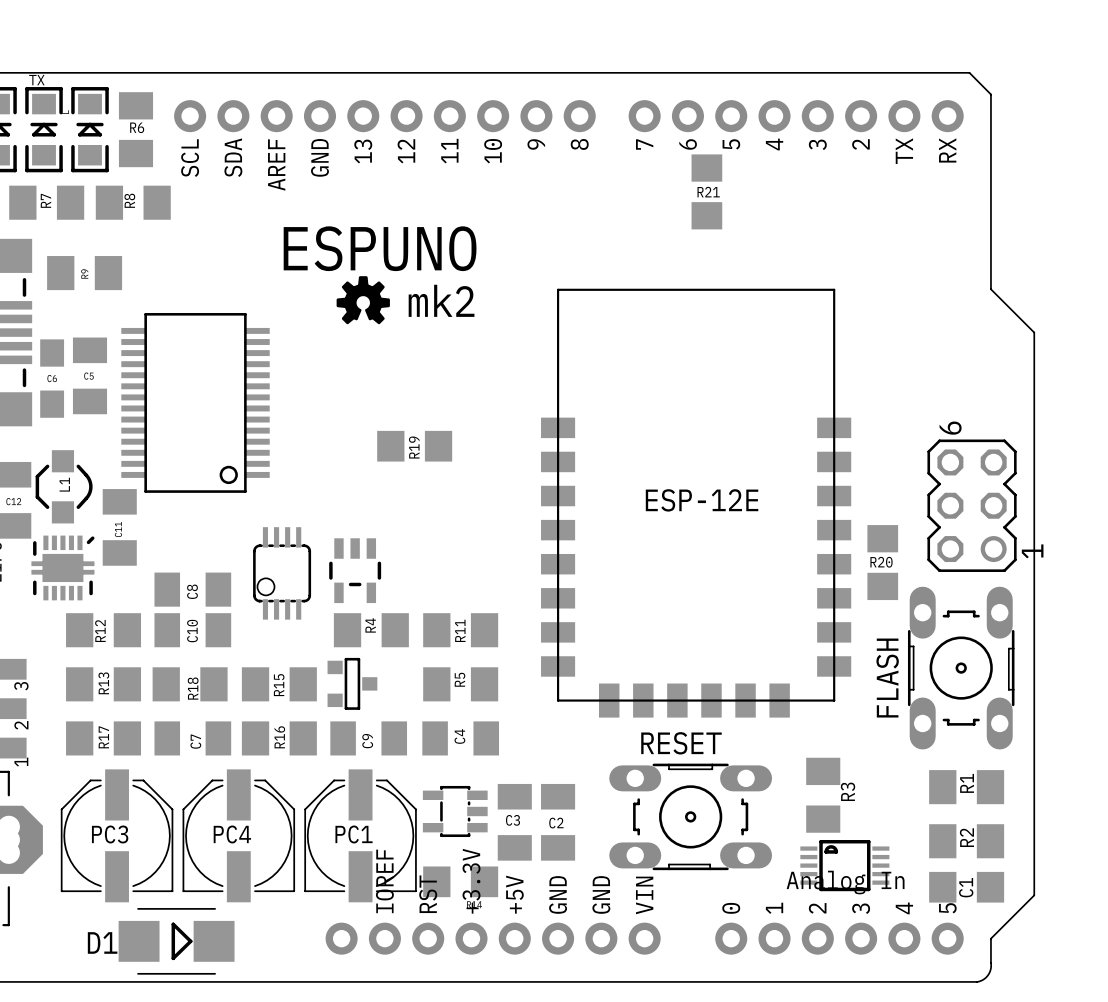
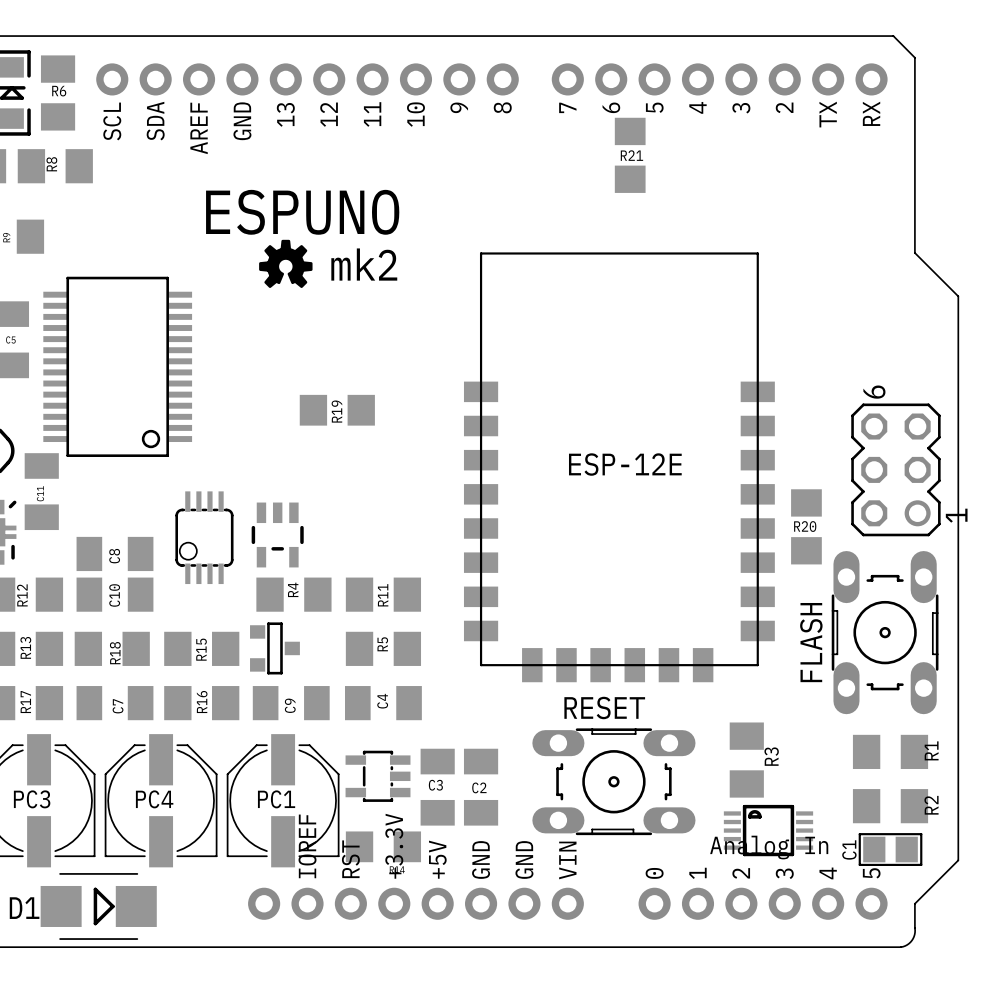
R1 name position: R1 (967, 783) -> R1 (931, 750)
R2 name position: R2 (966, 837) -> R2 (931, 805)
C1 footprint: [929, 871, 1005, 903] -> [858, 833, 923, 866]
C1 name position: C1 (966, 887) -> C1 (849, 849)

